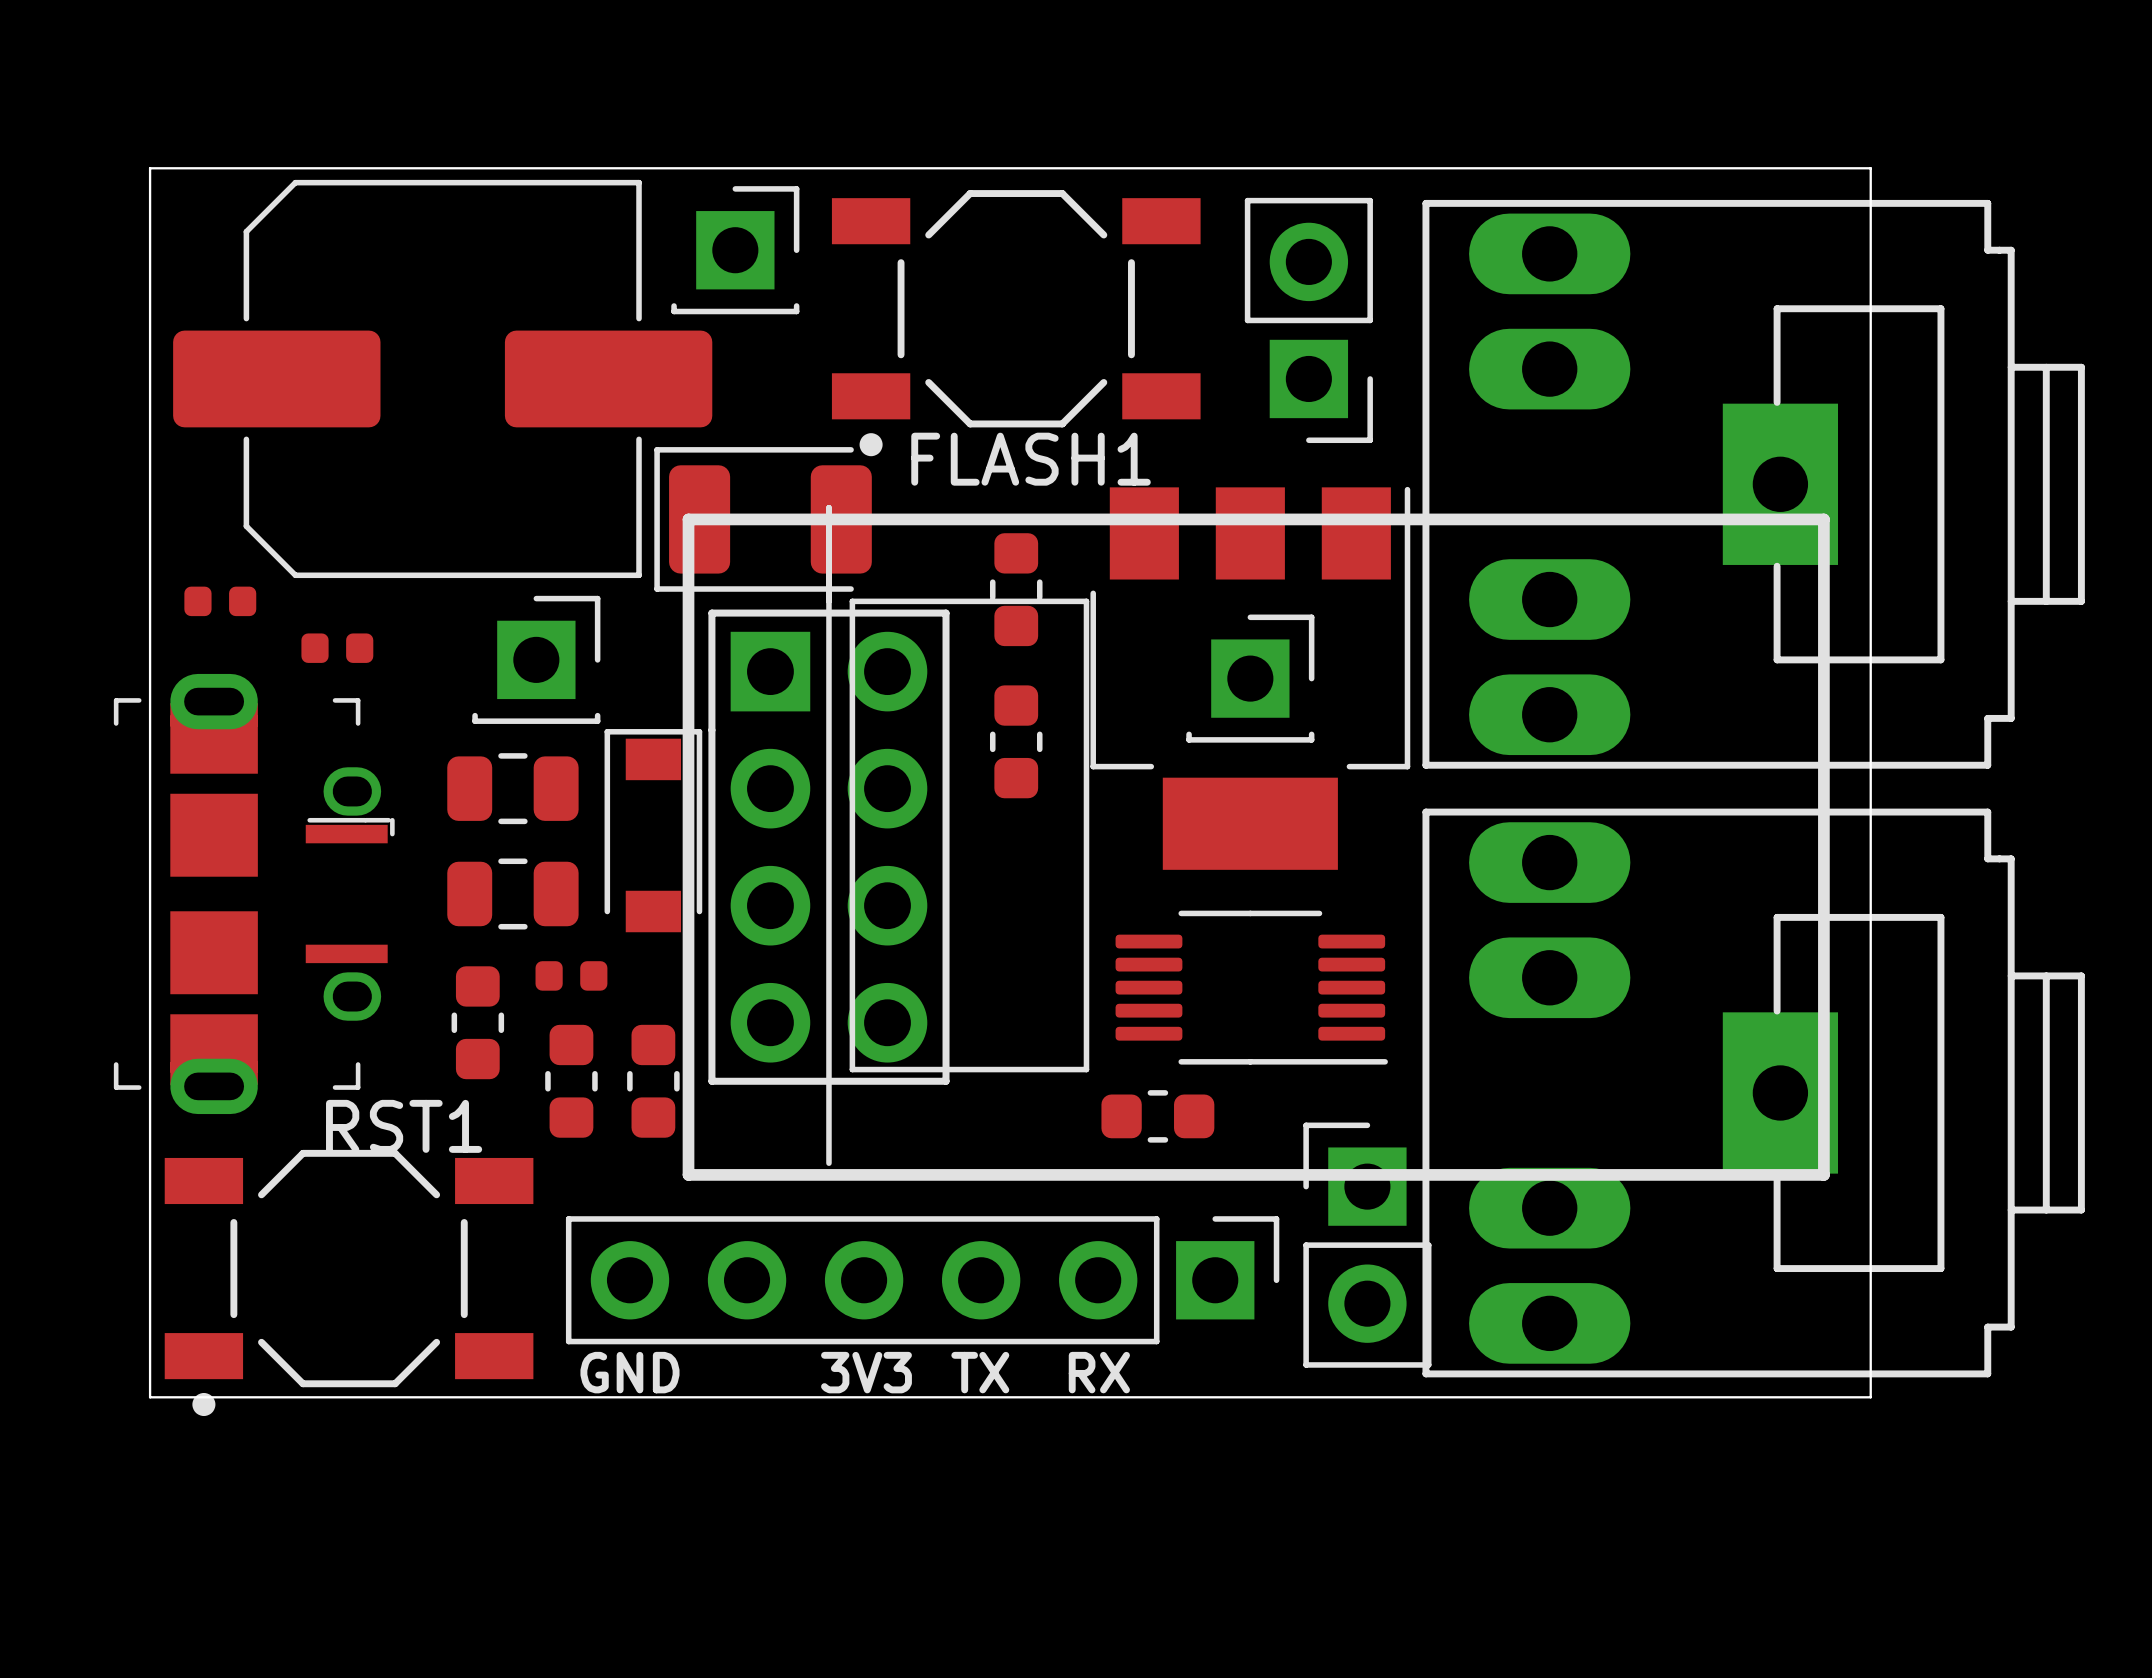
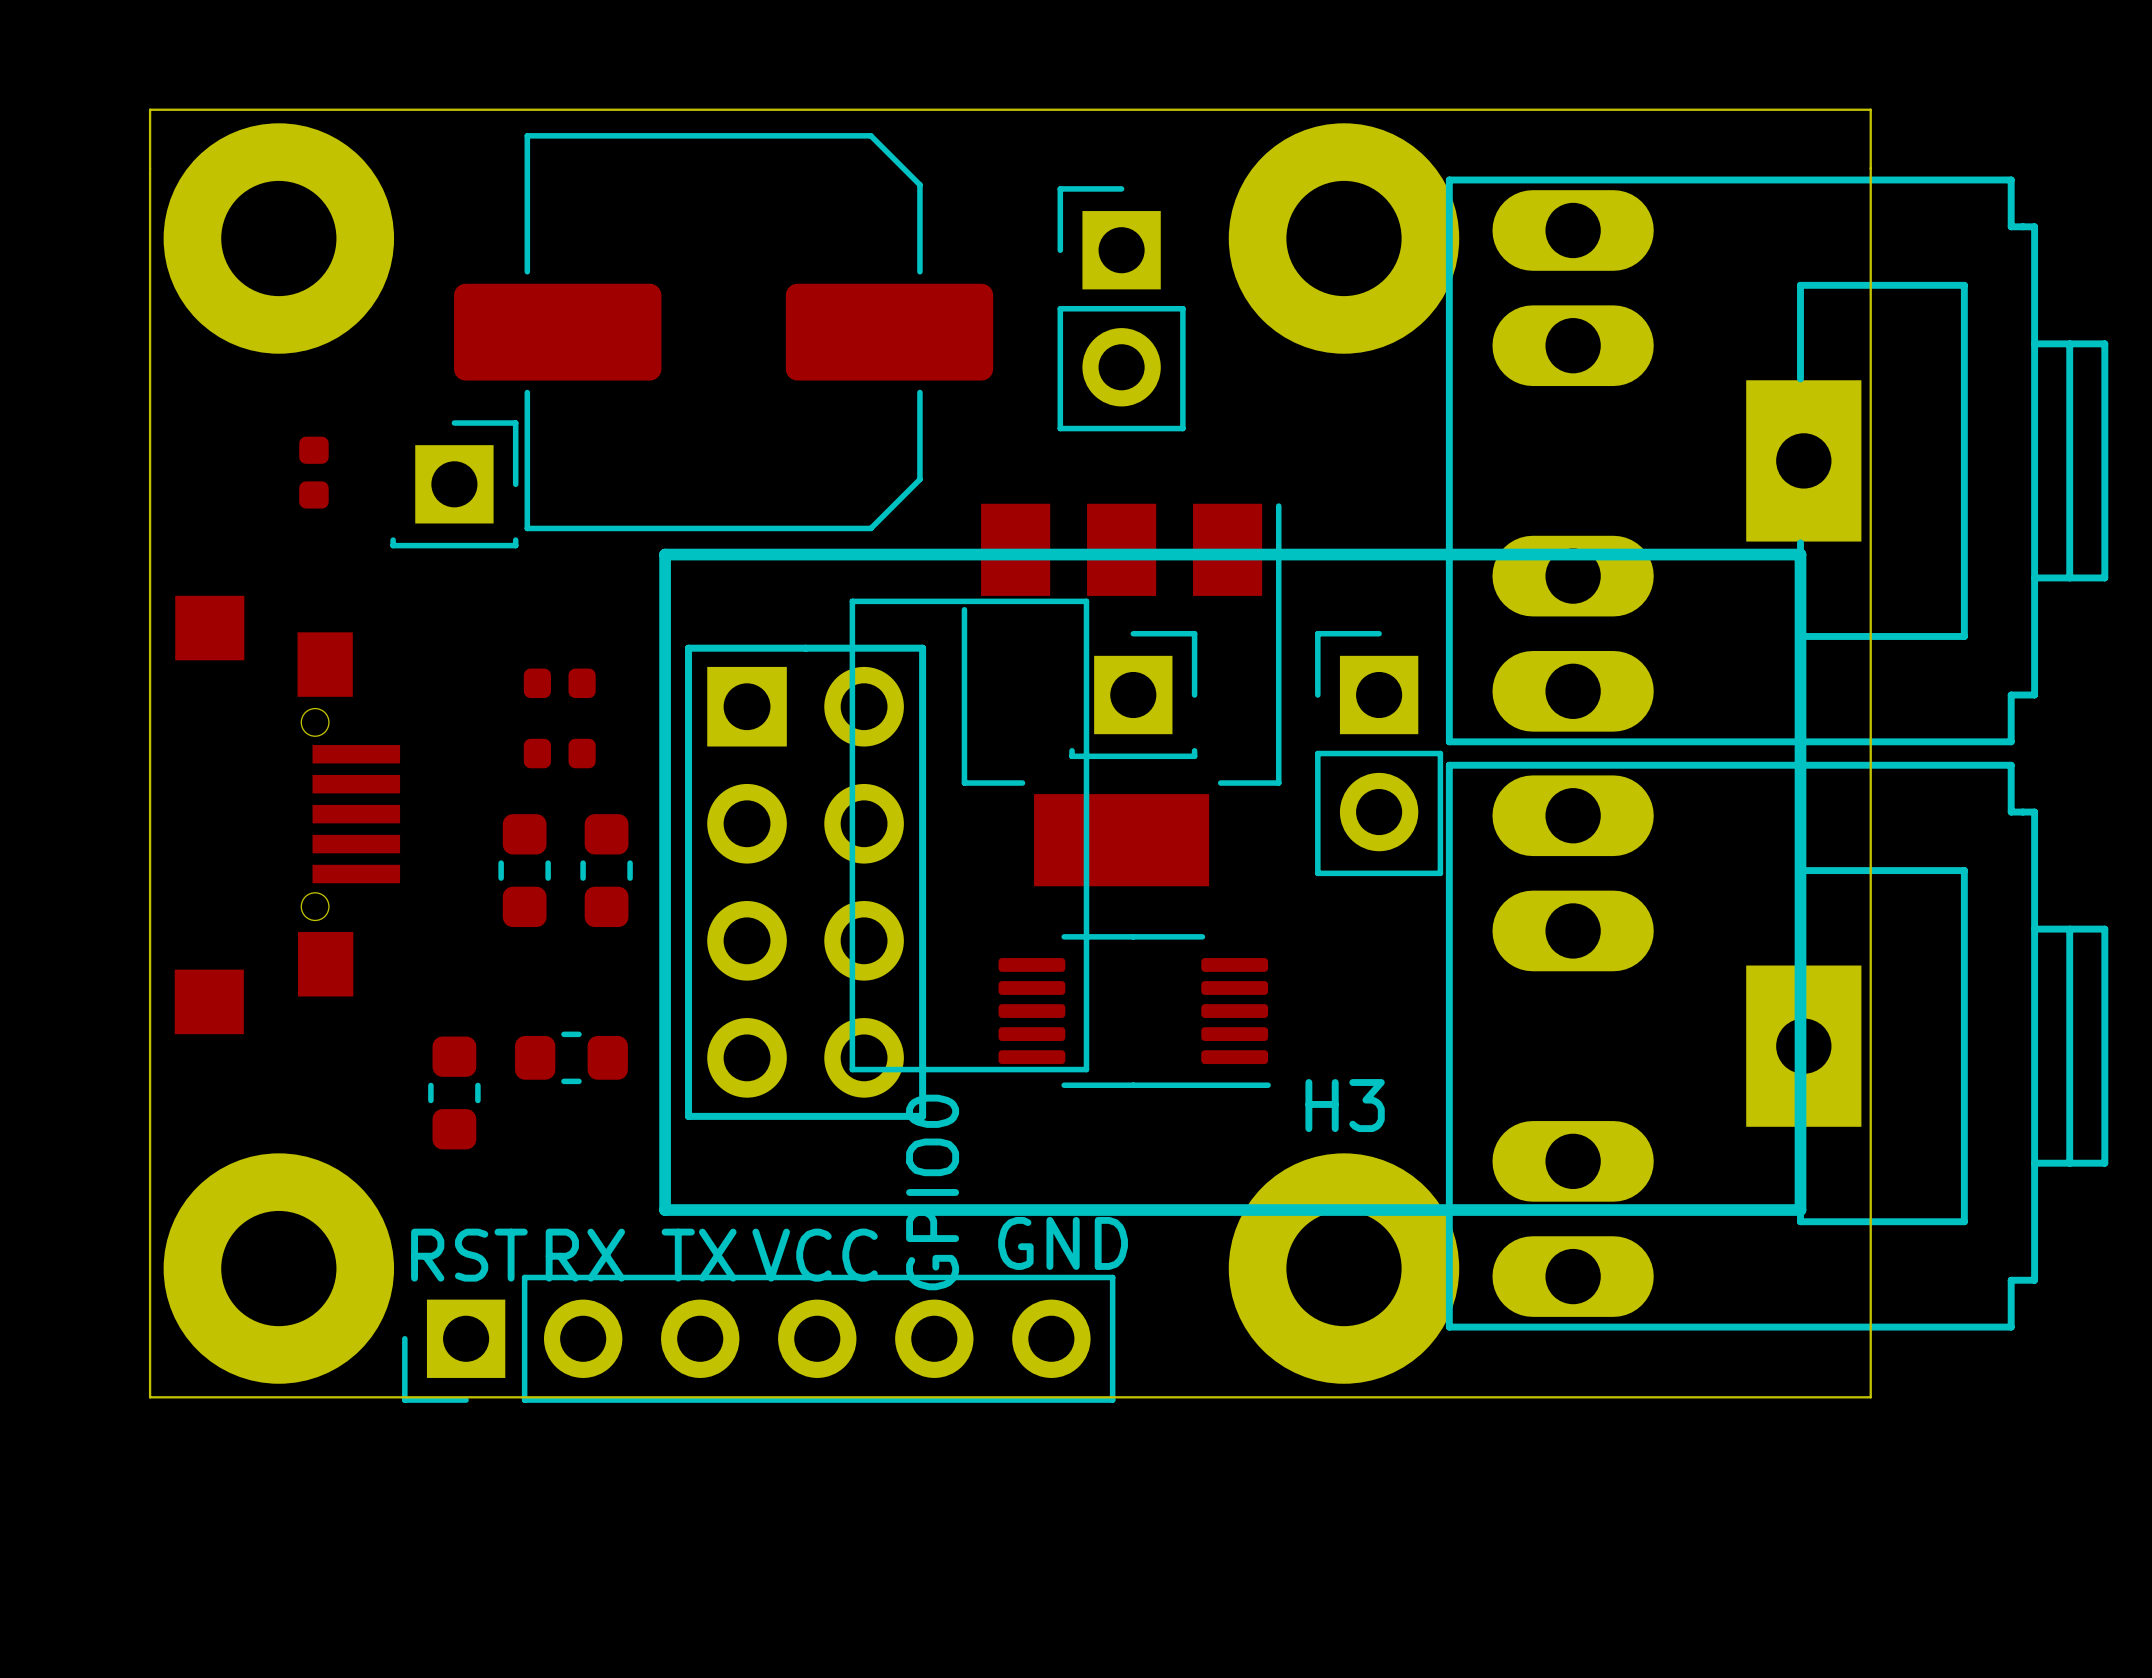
board edge: (150, 168) (1870, 168) -> (150, 168) (150, 109) (1870, 109) (1870, 168)
part: none -> (278, 238)
part: none -> (1343, 238)
part: (735, 250) -> none
part rotation: 0° (1308, 320) -> 180° (1121, 308)
part position: (1308, 320) -> (1121, 308)
FLASH1: (1016, 323) -> none
part rotation: 0° (442, 378) -> 180° (723, 332)
part: none -> (313, 472)
part: none -> (454, 484)
part position: (1753, 484) -> (1777, 460)
line: (828, 507) (828, 1163) -> none
part: (763, 519) -> none
part: (1016, 589) -> none
part footprint: [472, 595, 601, 724] -> [523, 668, 596, 699]
part: (220, 601) -> none
part: (337, 648) -> none
part position: (1250, 678) -> (1133, 695)
part position: (1250, 678) -> (1121, 694)
part: (1016, 741) -> none
part: none -> (559, 753)
part: none -> (1379, 753)
part: (512, 788) -> none
part: none -> (287, 814)
part: (653, 830) -> none
part position: (1256, 847) -> (1232, 882)
part footprint: [447, 858, 579, 930] -> [498, 814, 551, 928]
part: none -> (606, 870)
part: (254, 893) -> none
part: (571, 975) -> none
part position: (1251, 987) -> (1134, 1011)
part position: (477, 1022) -> (454, 1092)
part rotation: 0° (571, 1081) -> 90° clockwise (571, 1057)
part: (653, 1081) -> none
part position: (1753, 1092) -> (1777, 1046)
part: (1157, 1116) -> none
part: (1367, 1245) -> none
part: none -> (278, 1268)
H3: none -> (1343, 1268)
part: (922, 1280) -> none
RST1: (349, 1282) -> none
part: none -> (758, 1338)

